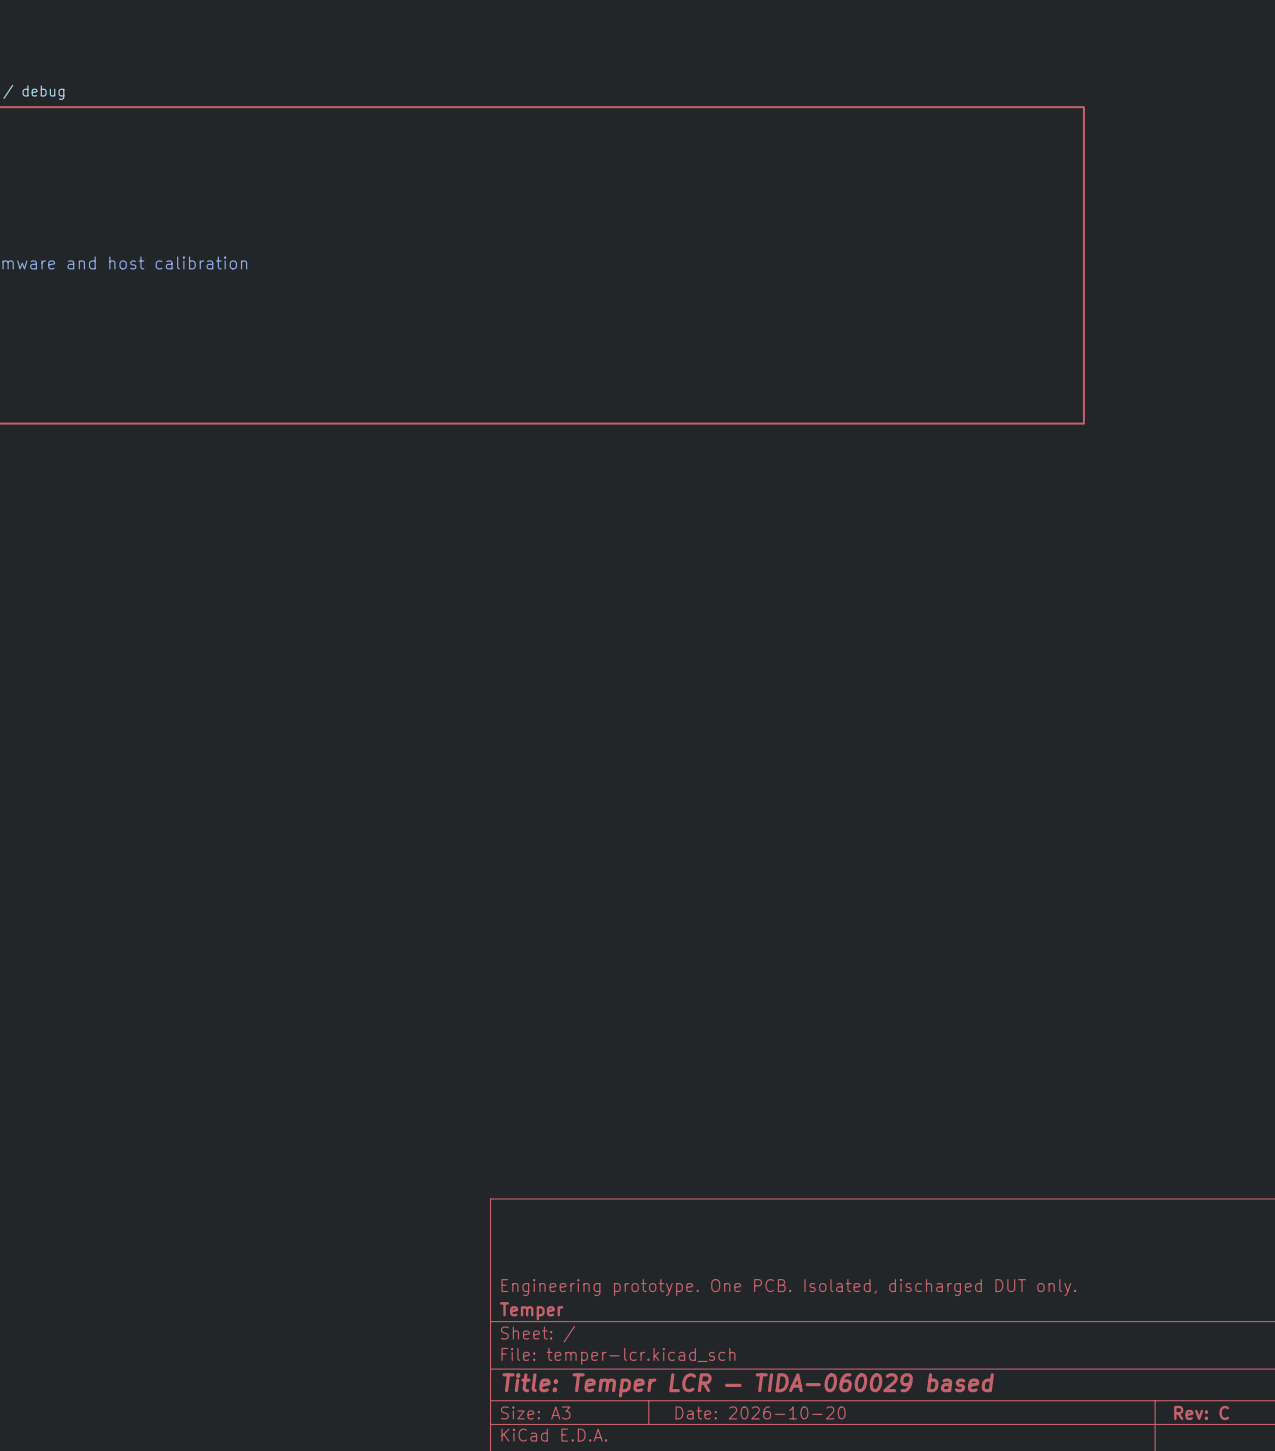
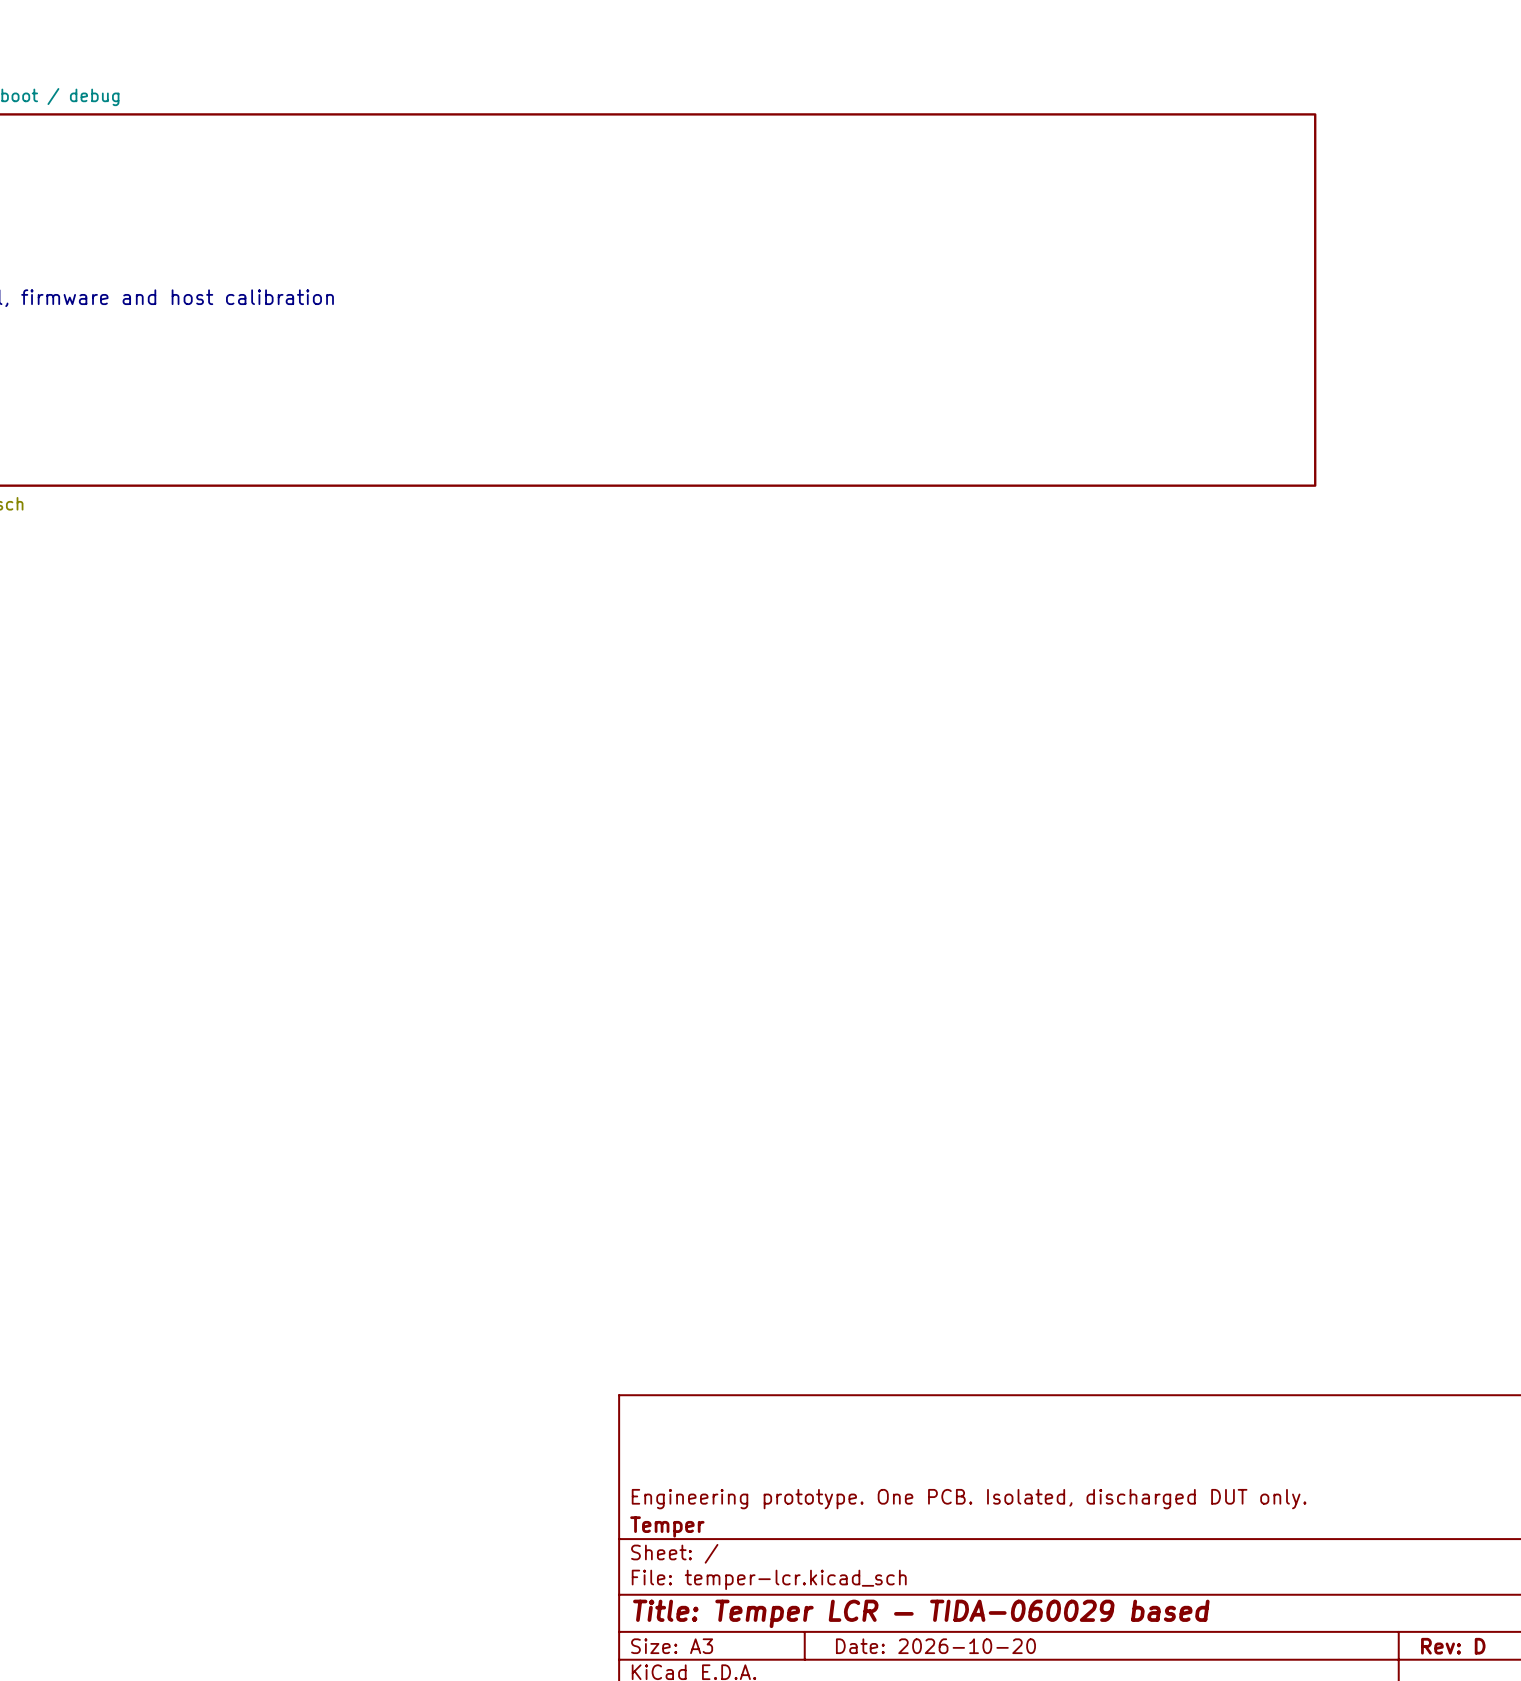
title block: Rev: C (1201, 1412) -> Rev: D (1453, 1646)

